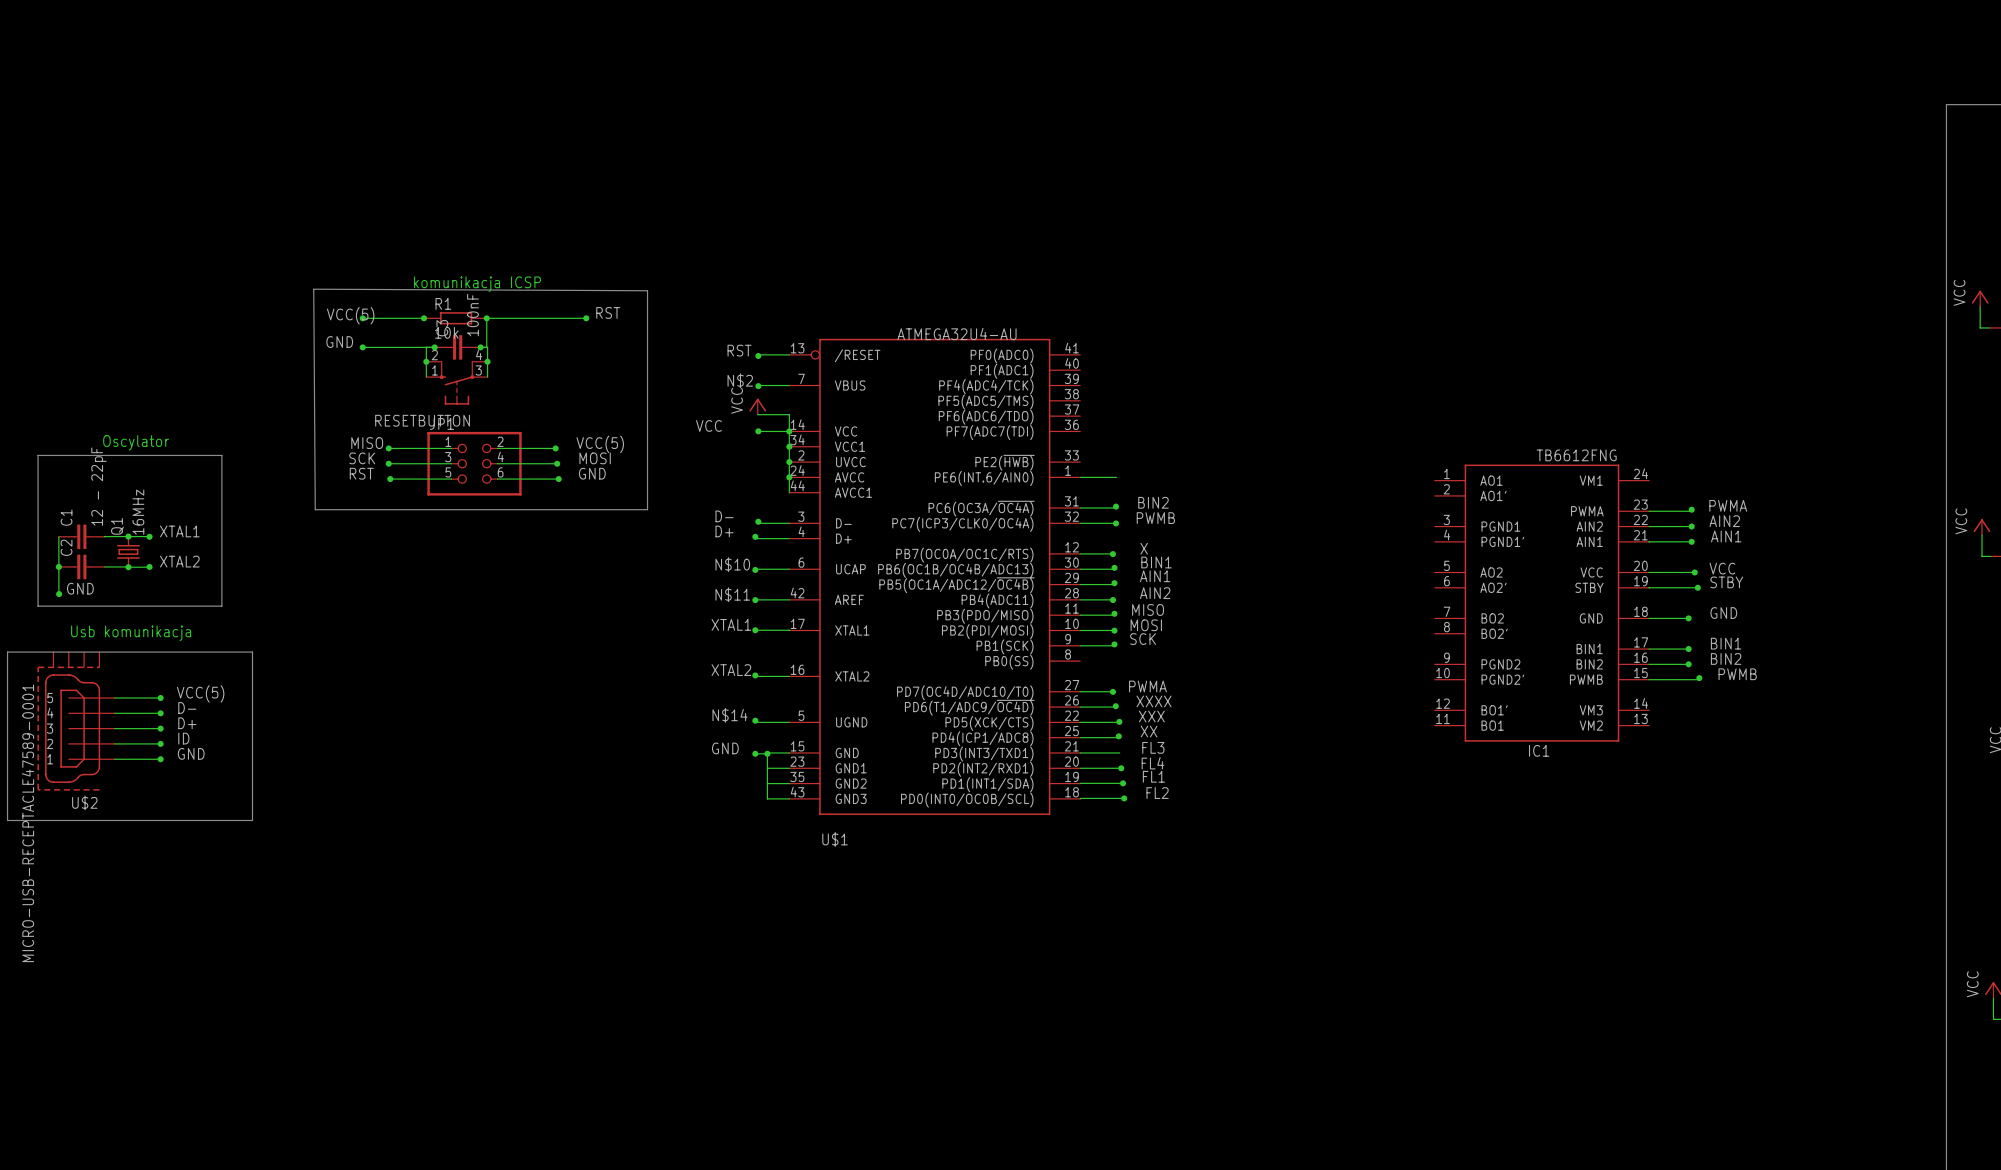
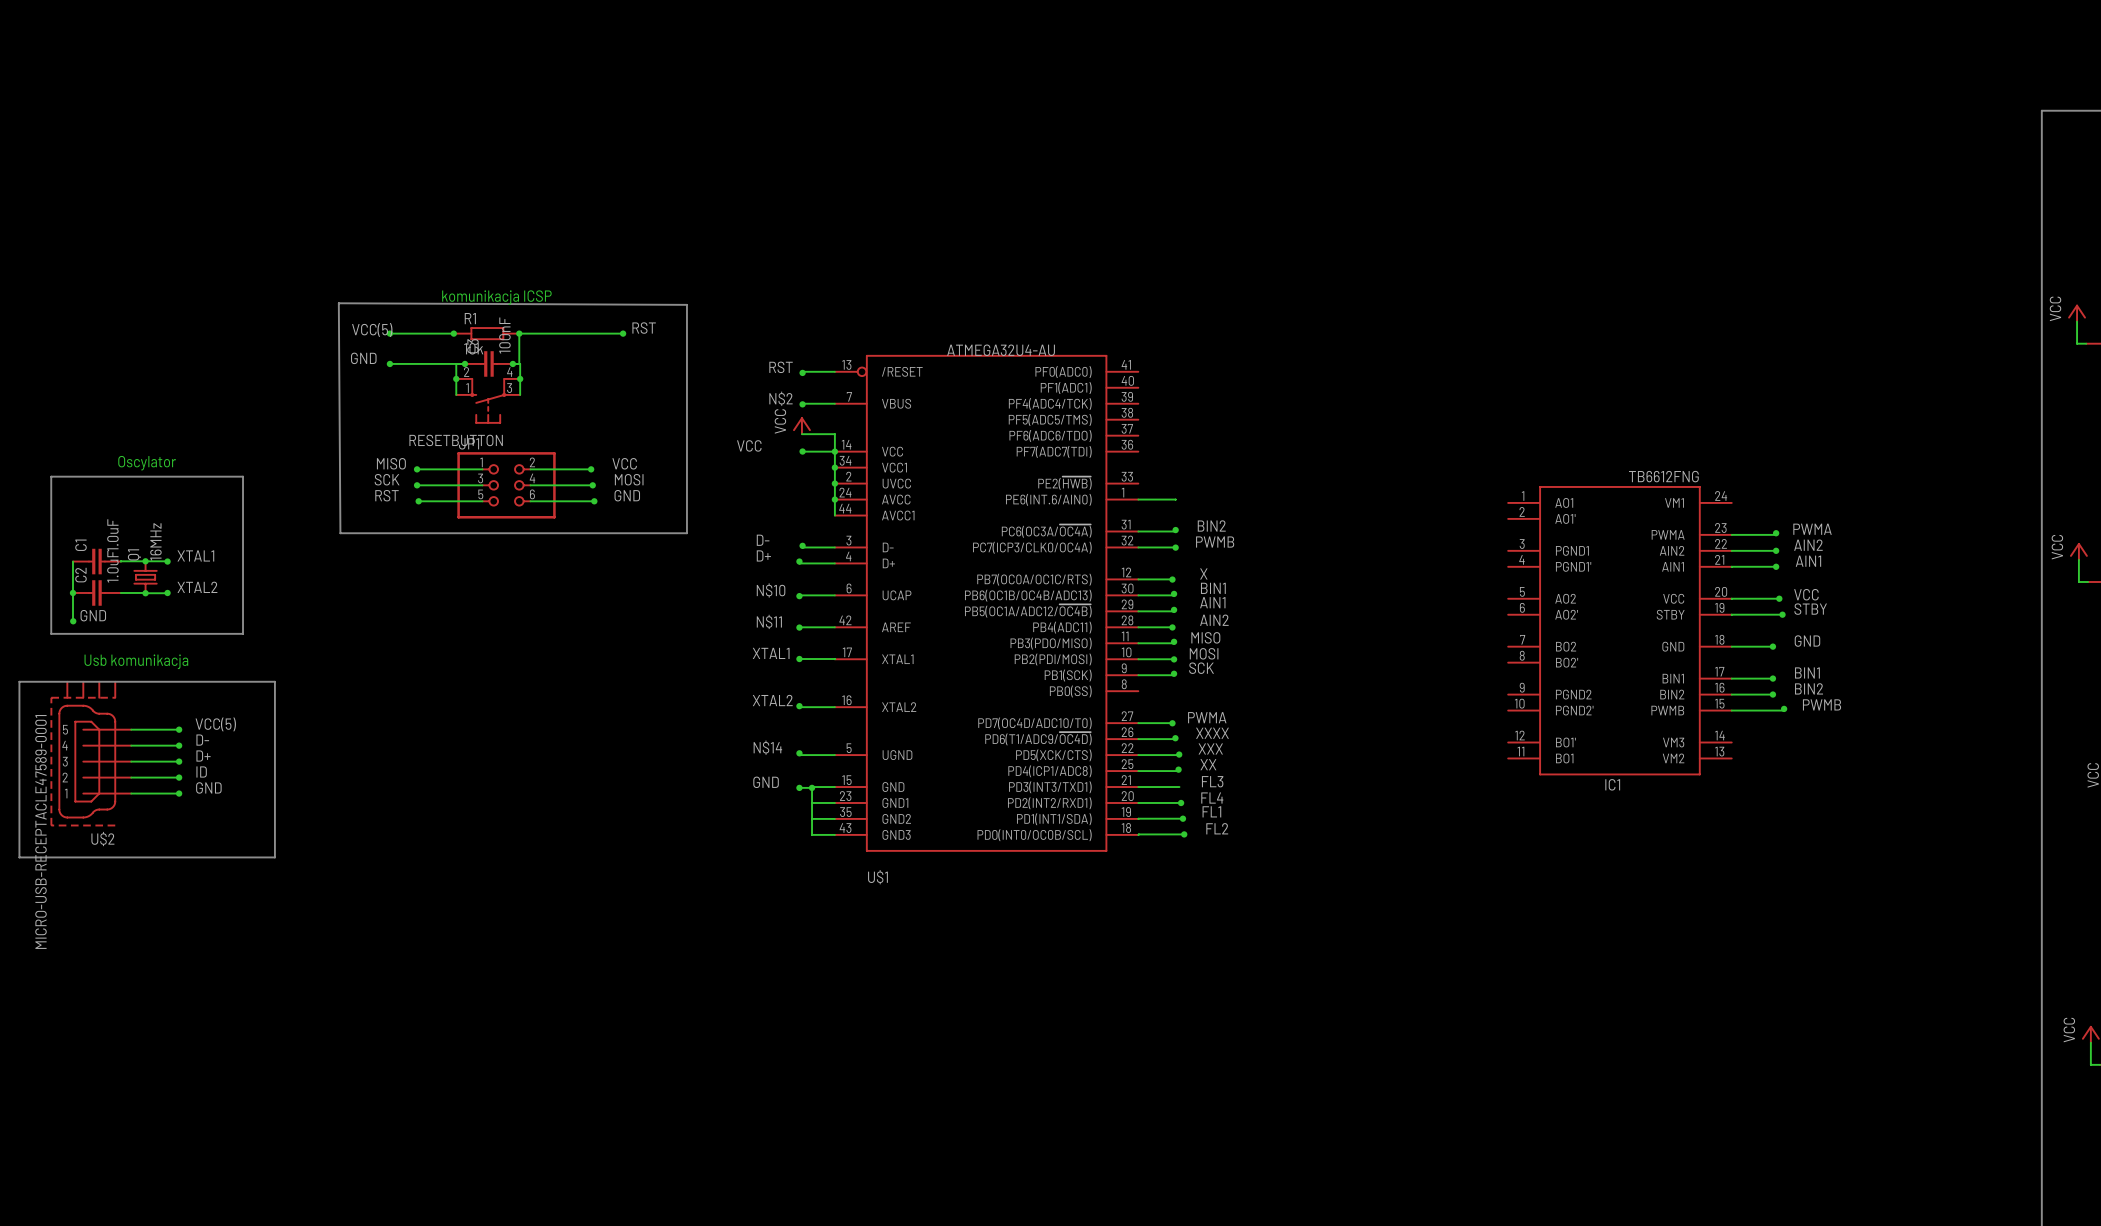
label: VCC(5) (600, 444) -> VCC (624, 463)
C1 value: 12 - 22pF (98, 486) -> 1.0uF (112, 535)
C2 value: none -> 1.0uF (112, 566)

